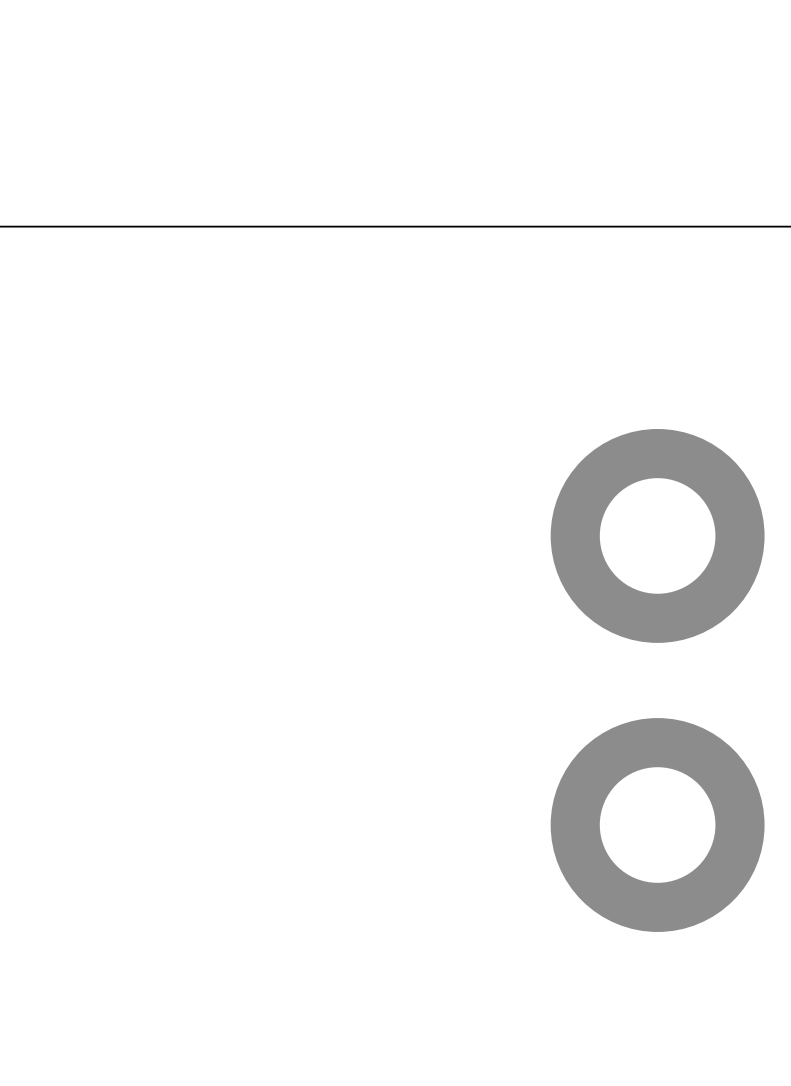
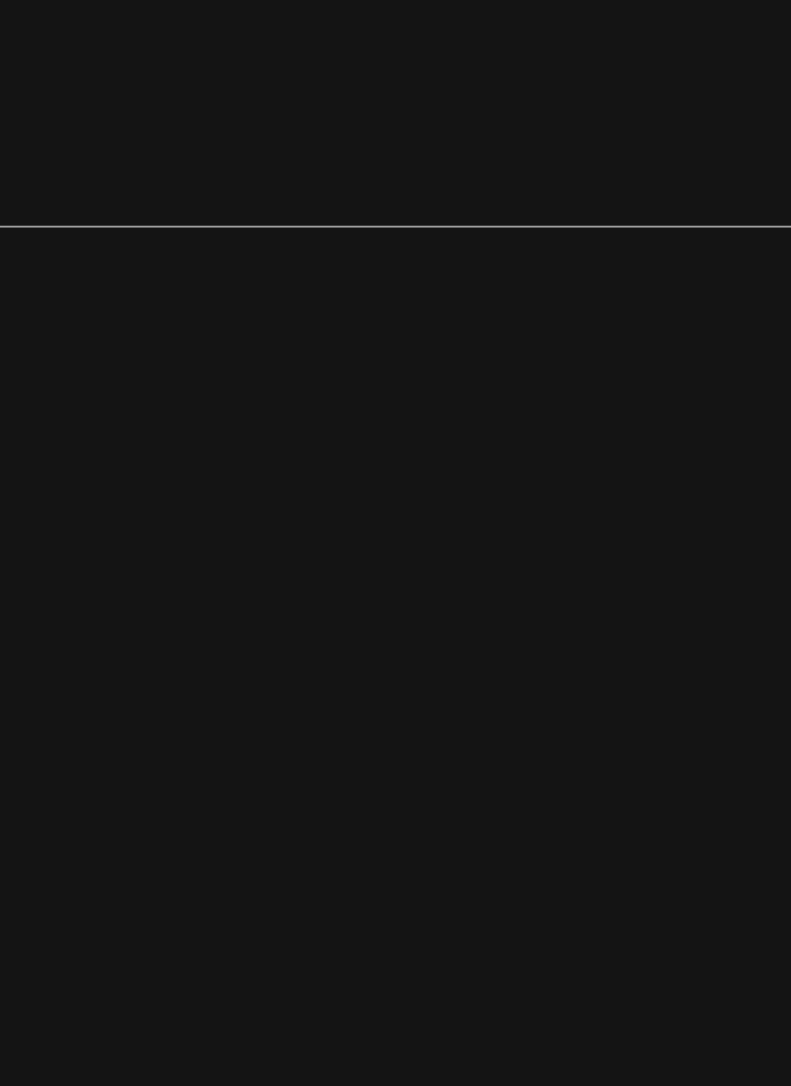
part: (657, 680) -> none

